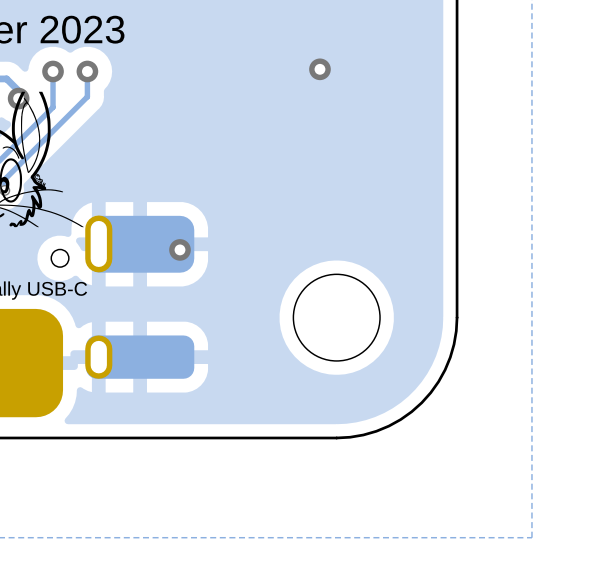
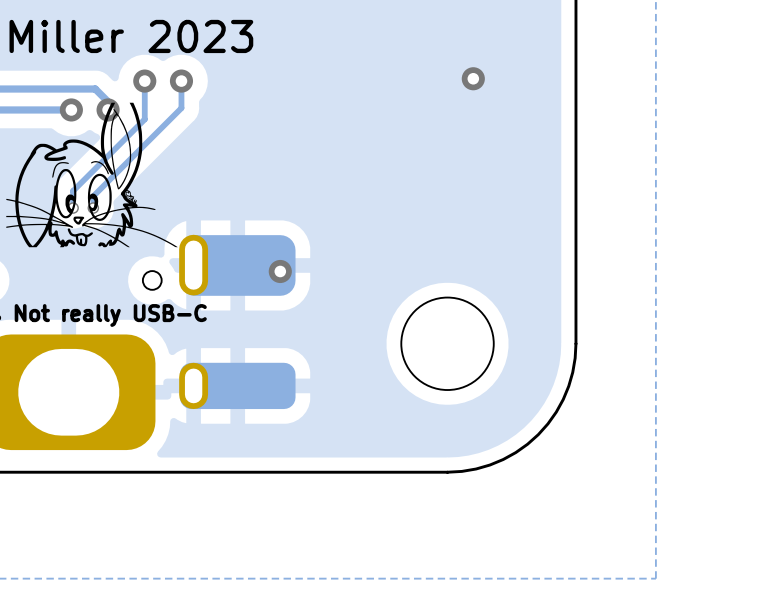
via position: (319, 69) -> (473, 78)

